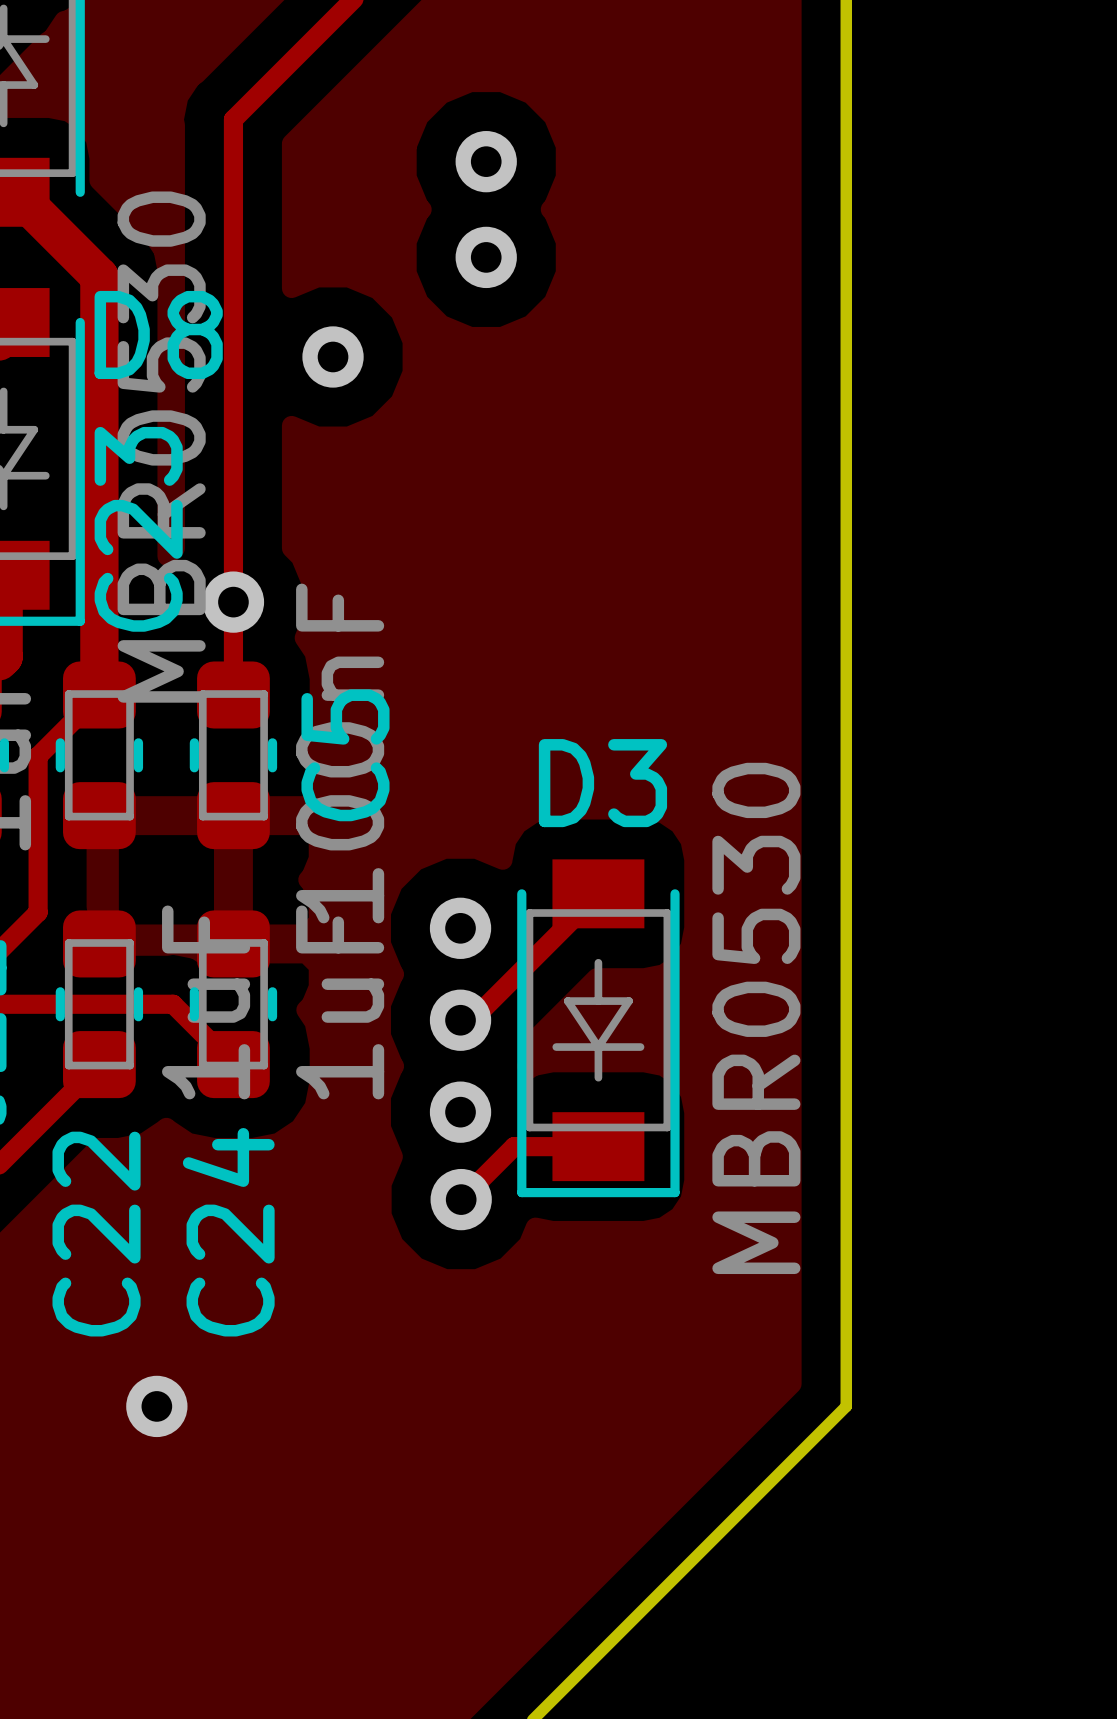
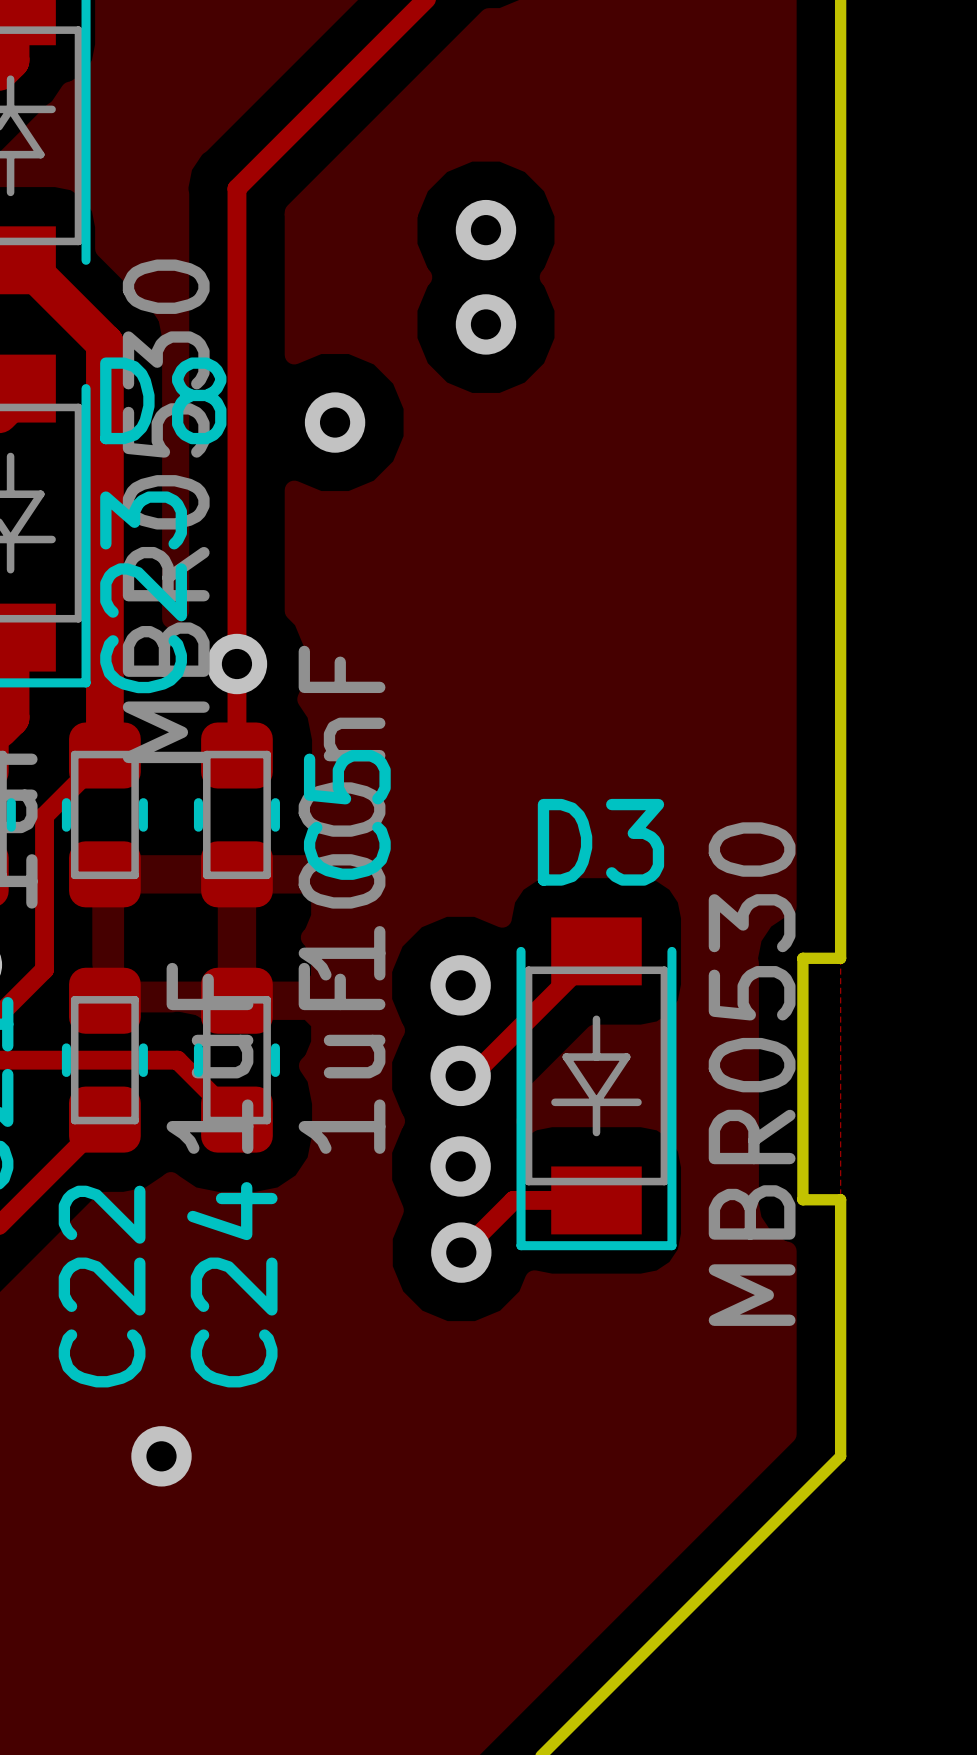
board edge: (846, 900) (846, 1145) -> (840, 958) (802, 958) (802, 1199) (840, 1199)

